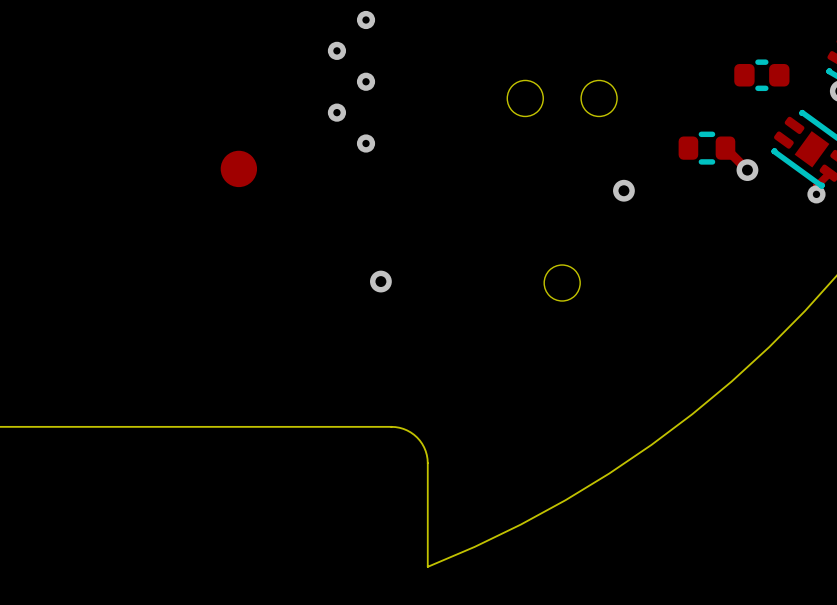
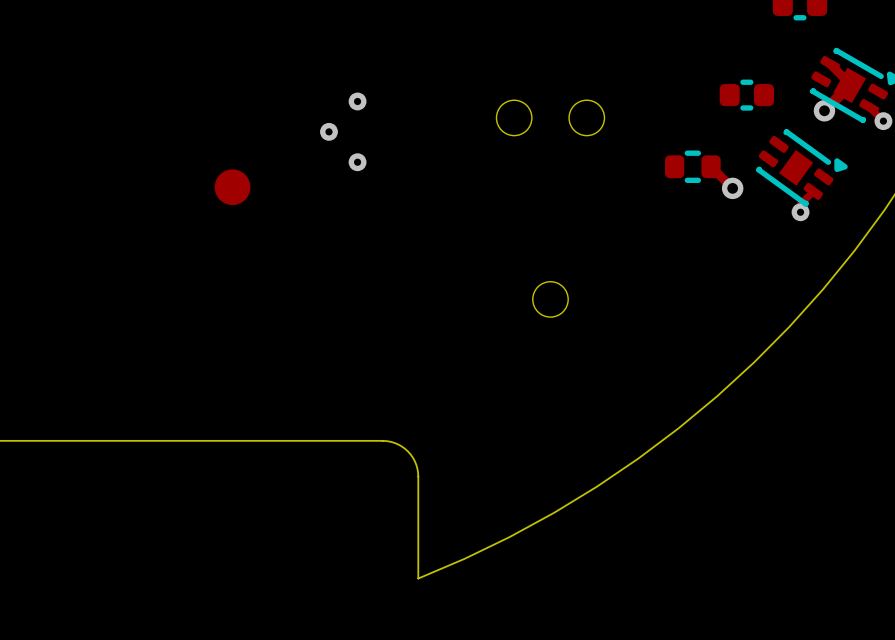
via: (366, 19) -> none
via: (336, 50) -> none
via: (623, 190) -> none
via: (380, 281) -> none

